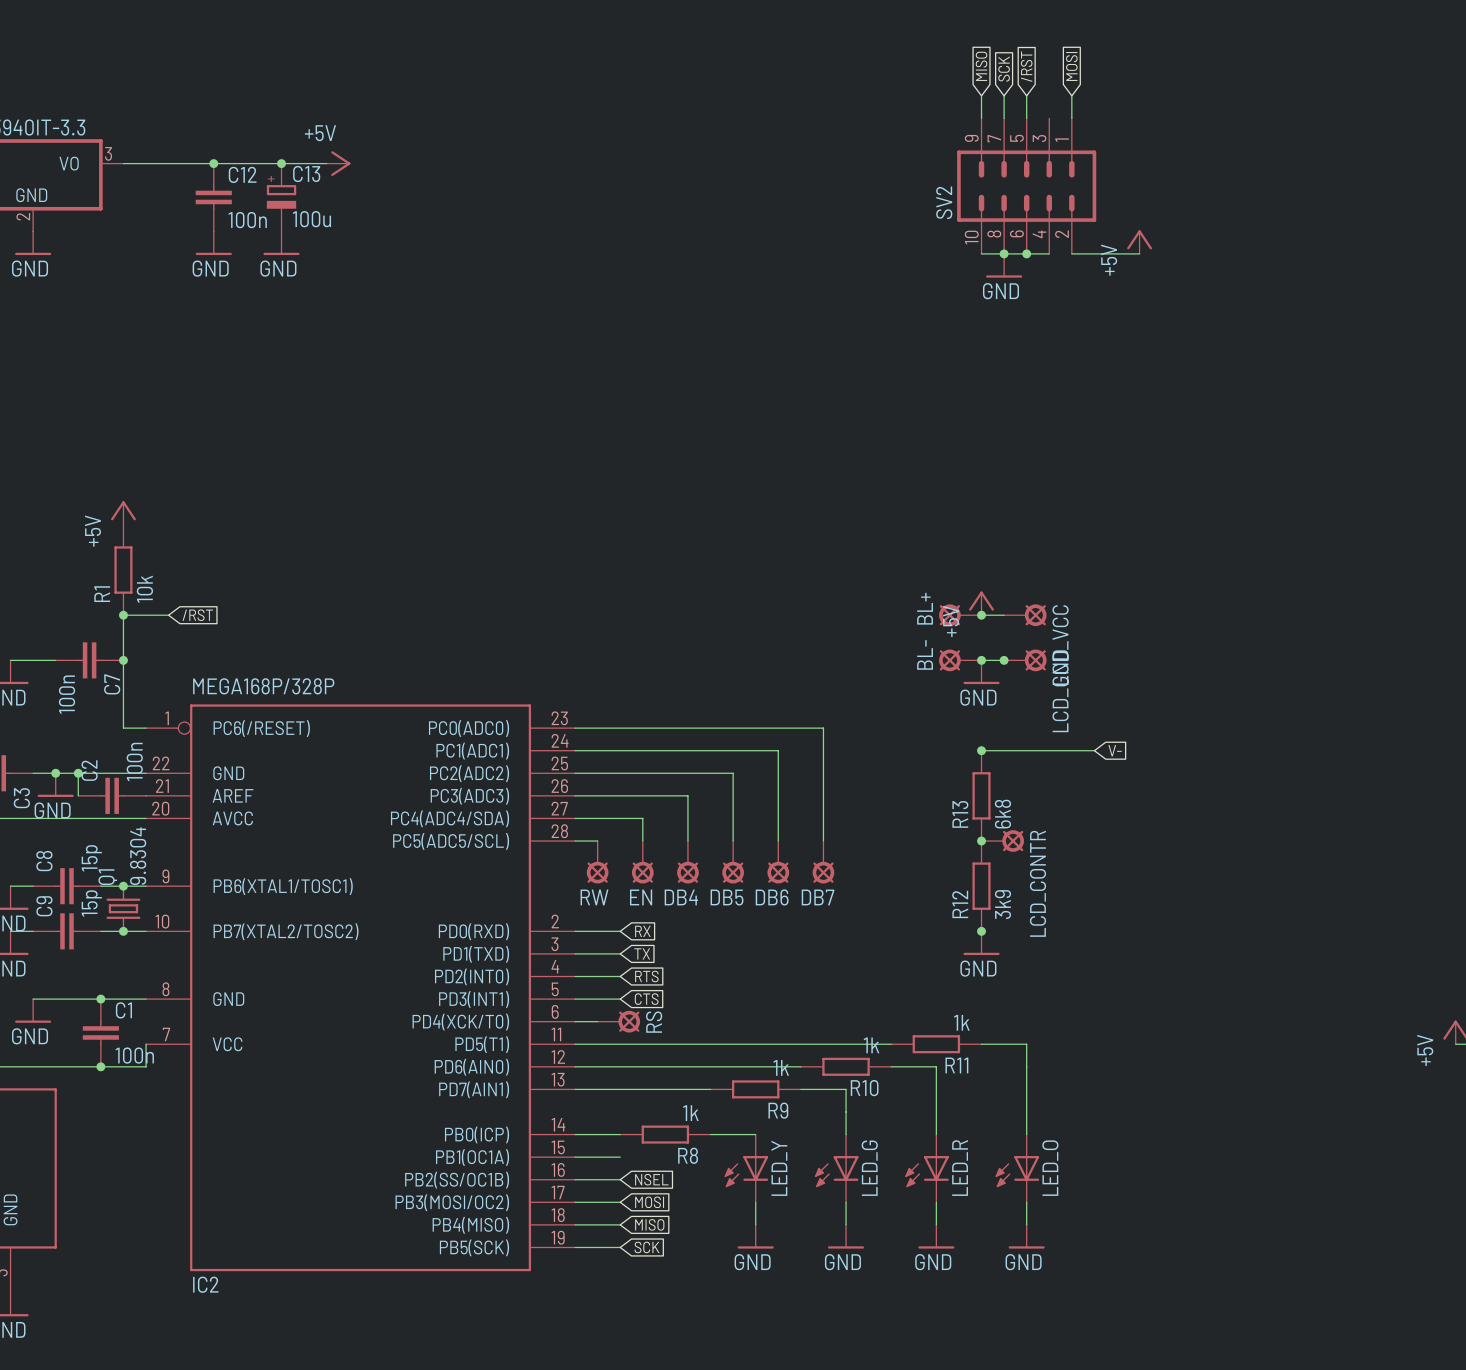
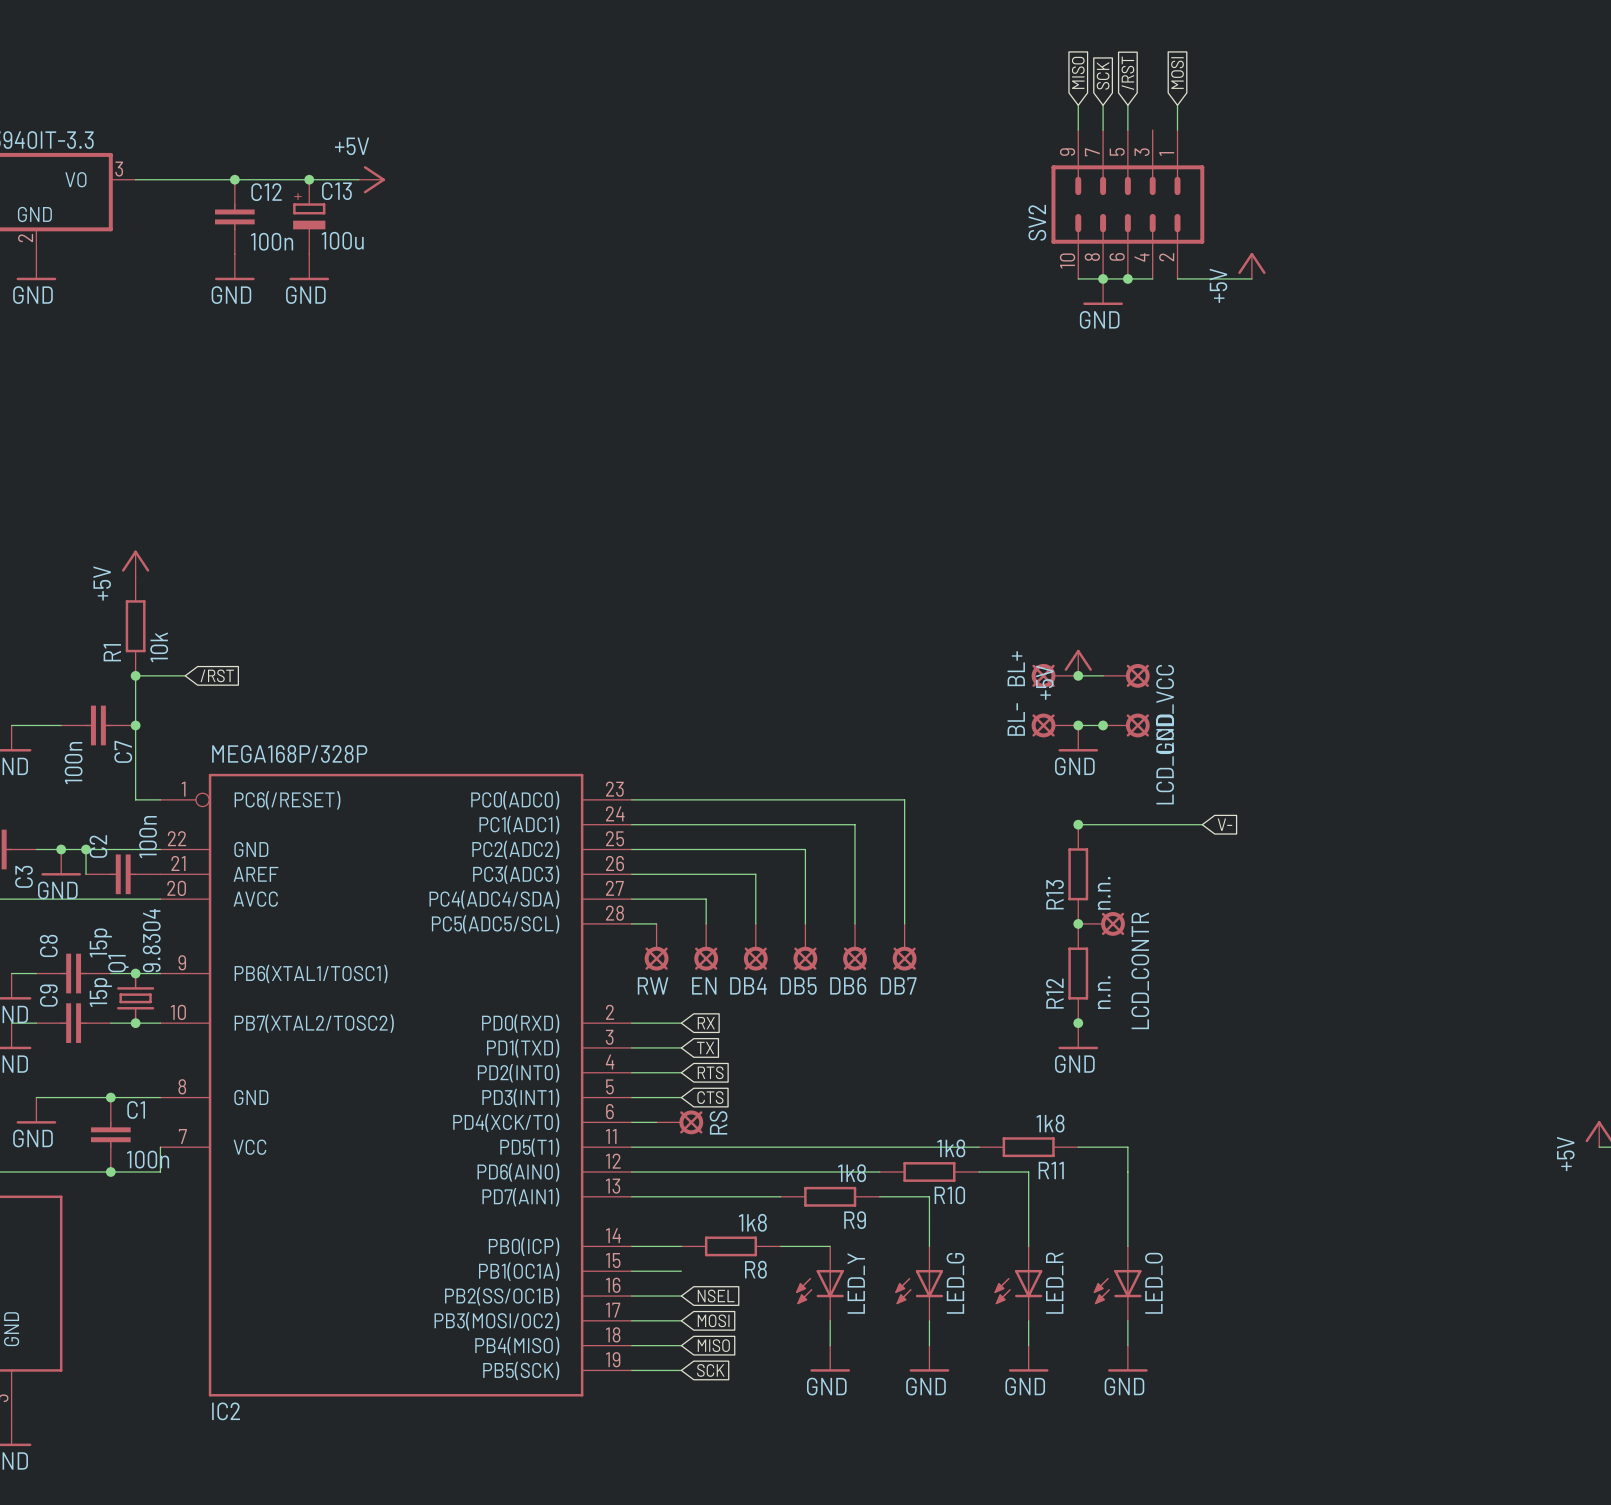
R13 value: 6k8 (1002, 814) -> n.n. (1104, 893)
R12 value: 3k9 (1002, 904) -> n.n. (1104, 992)
R11 value: 1k (961, 1022) -> 1k8 (1050, 1123)
R10 value: 1k (871, 1045) -> 1k8 (951, 1148)
R9 value: 1k (781, 1067) -> 1k8 (852, 1173)
R8 value: 1k (690, 1113) -> 1k8 (752, 1222)

